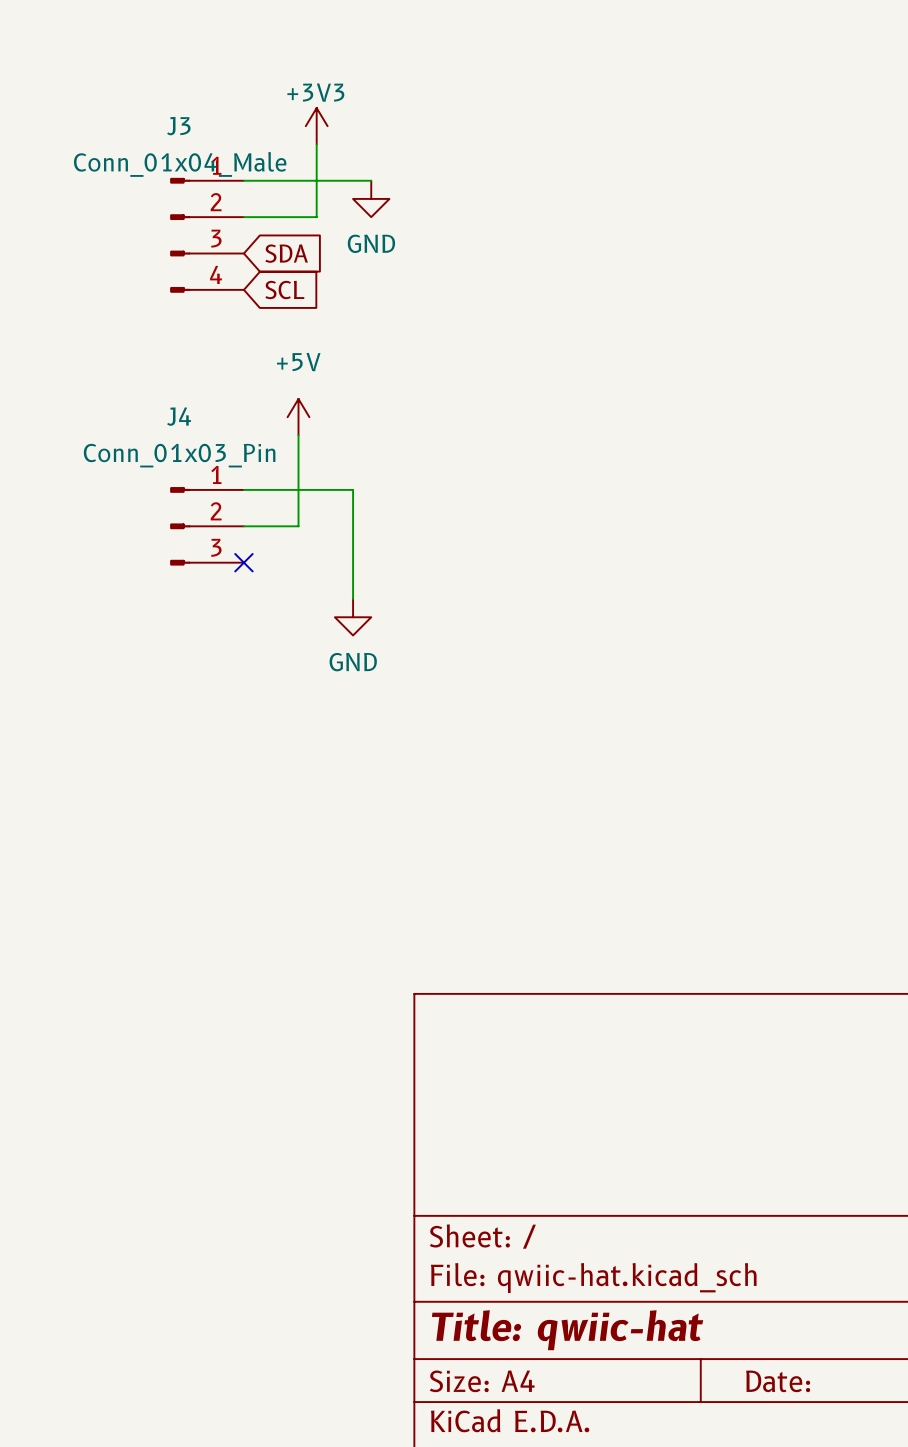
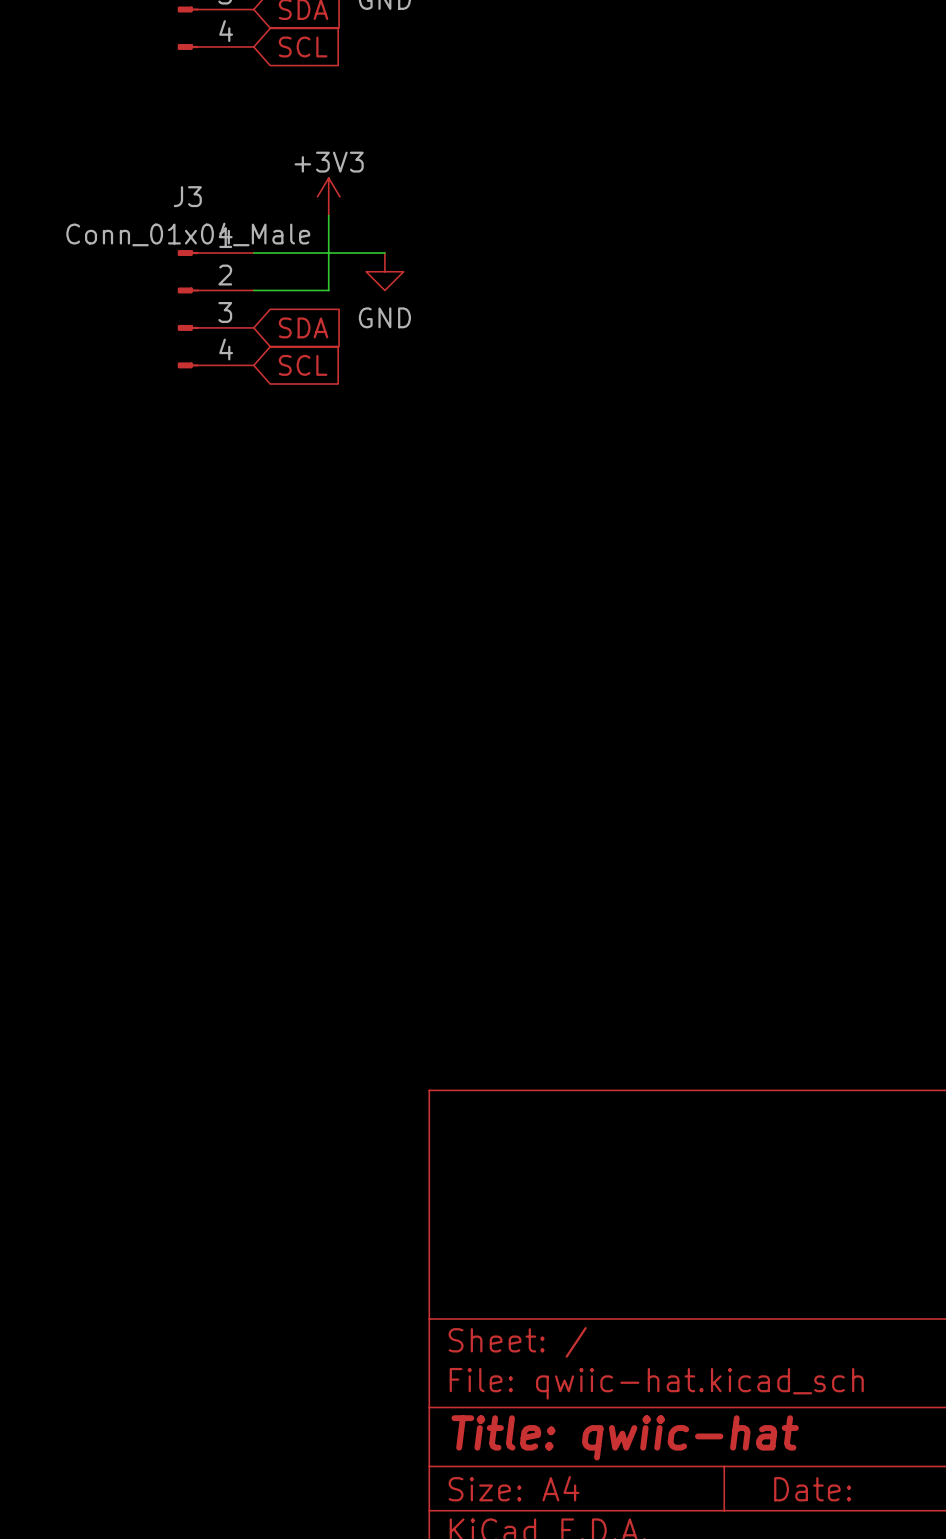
power symbol: +5V (298, 417) -> none
wire: (298, 435) (298, 526) (243, 526) -> none
wire: (243, 489) (353, 489) (353, 599) -> none
J4: Conn_01x03_Pin (207, 526) -> none
no-connect mark: (243, 562) -> none
power symbol: GND (353, 617) -> none

